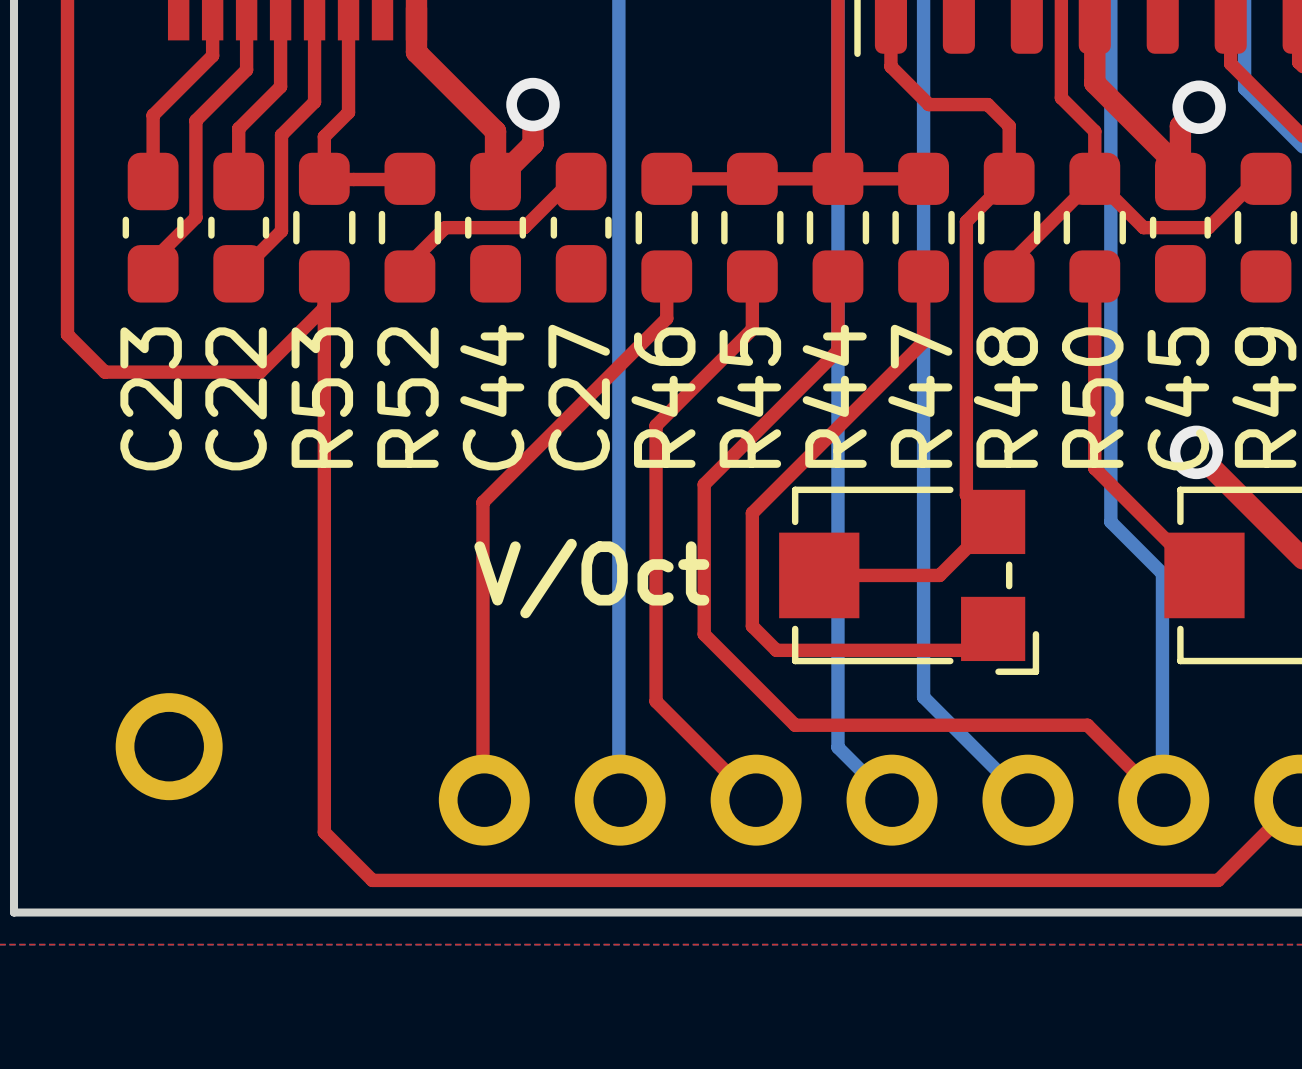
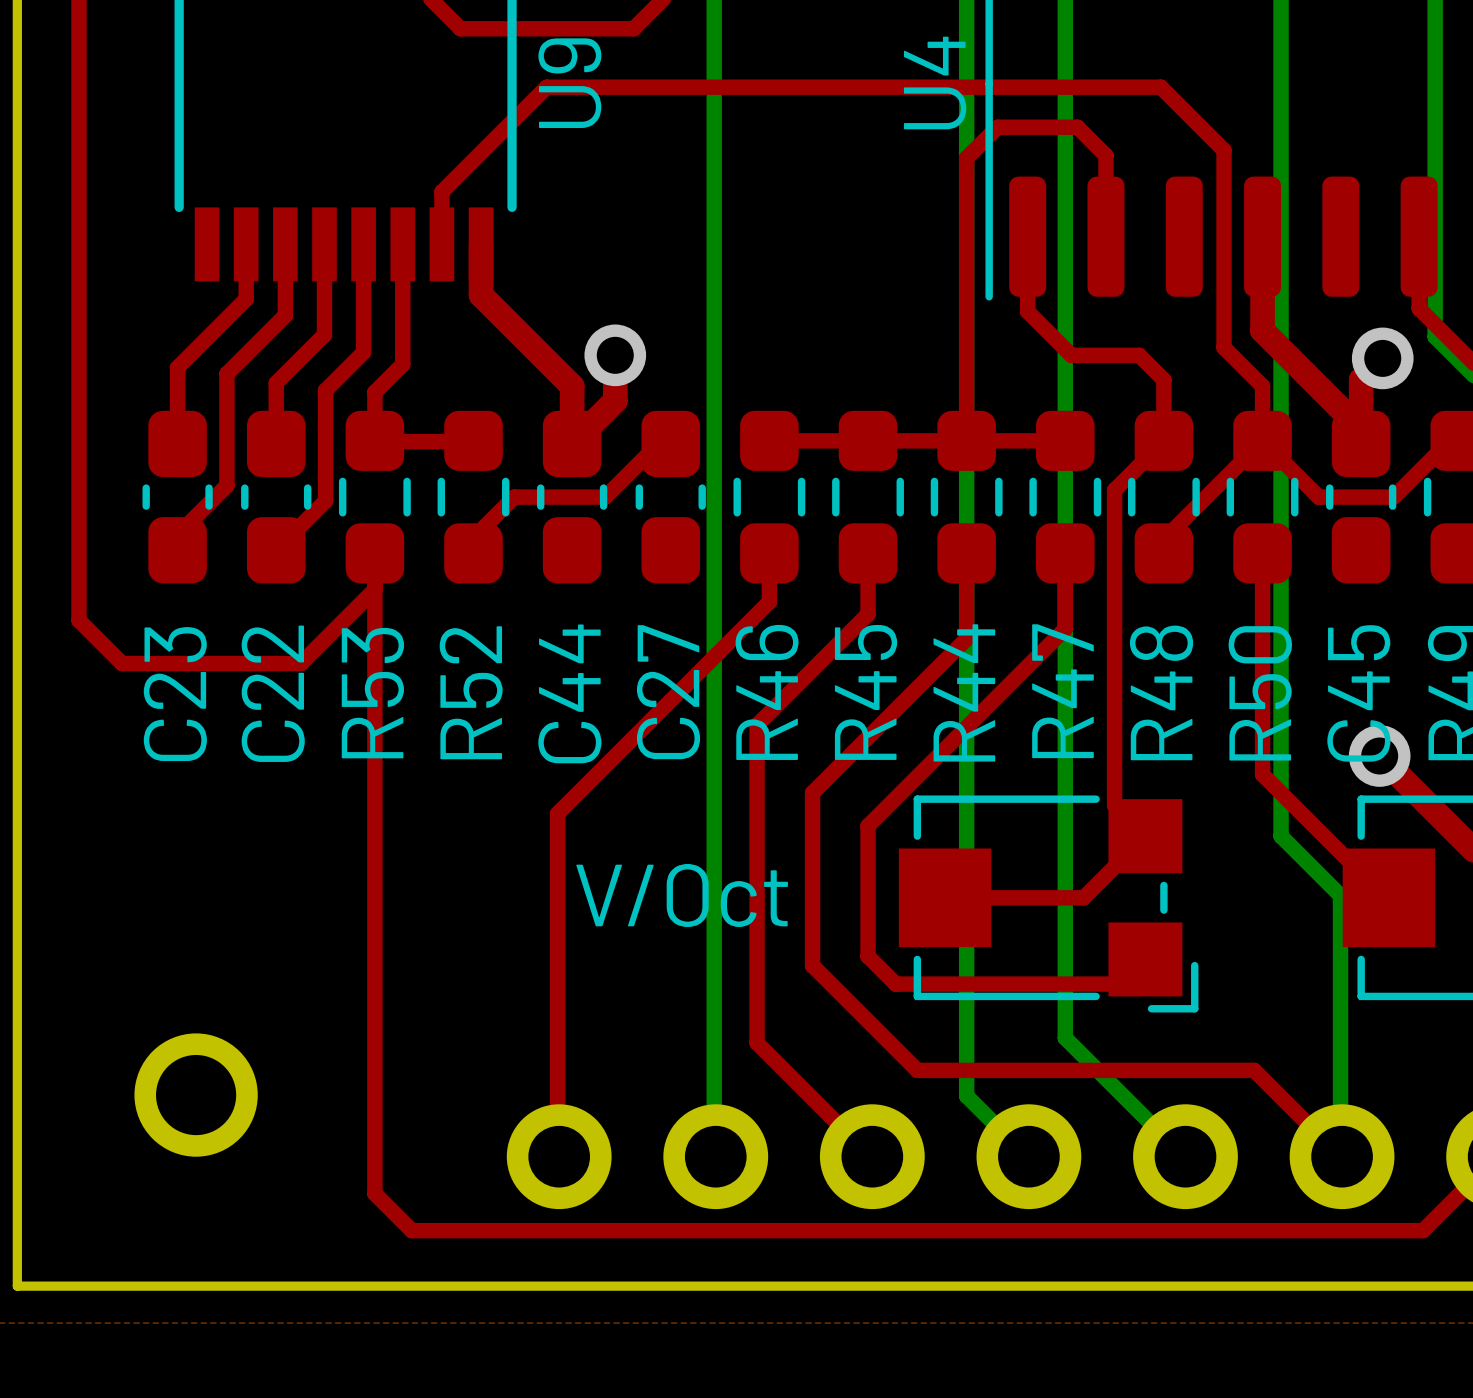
top track: (356, 864) (372, 880) (1218, 880) (1234, 864) -> (411, 1230) (1423, 1230)

